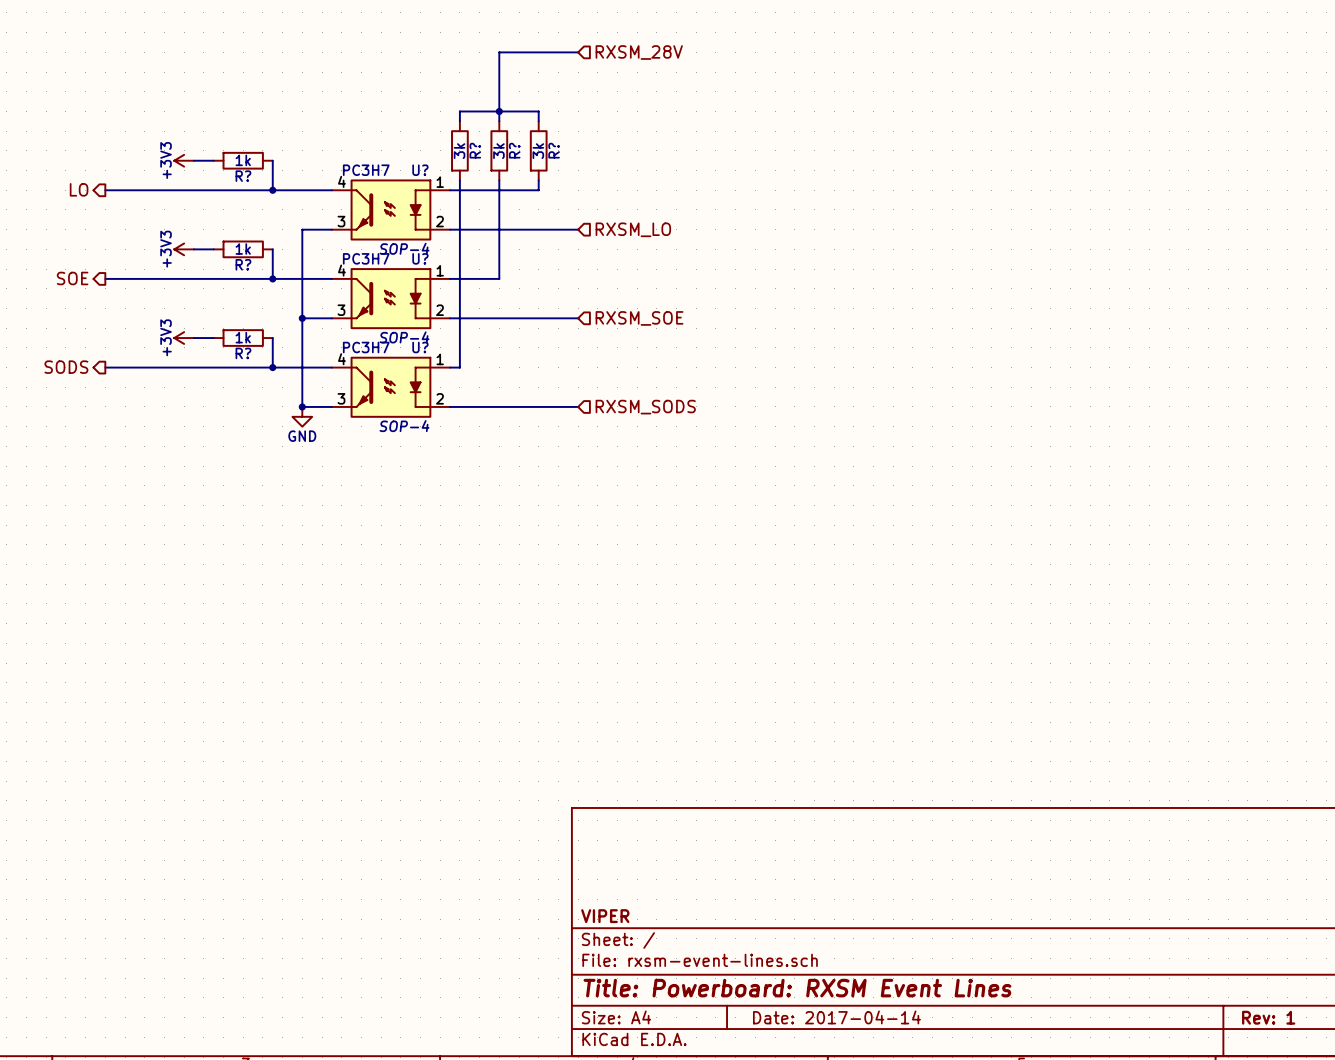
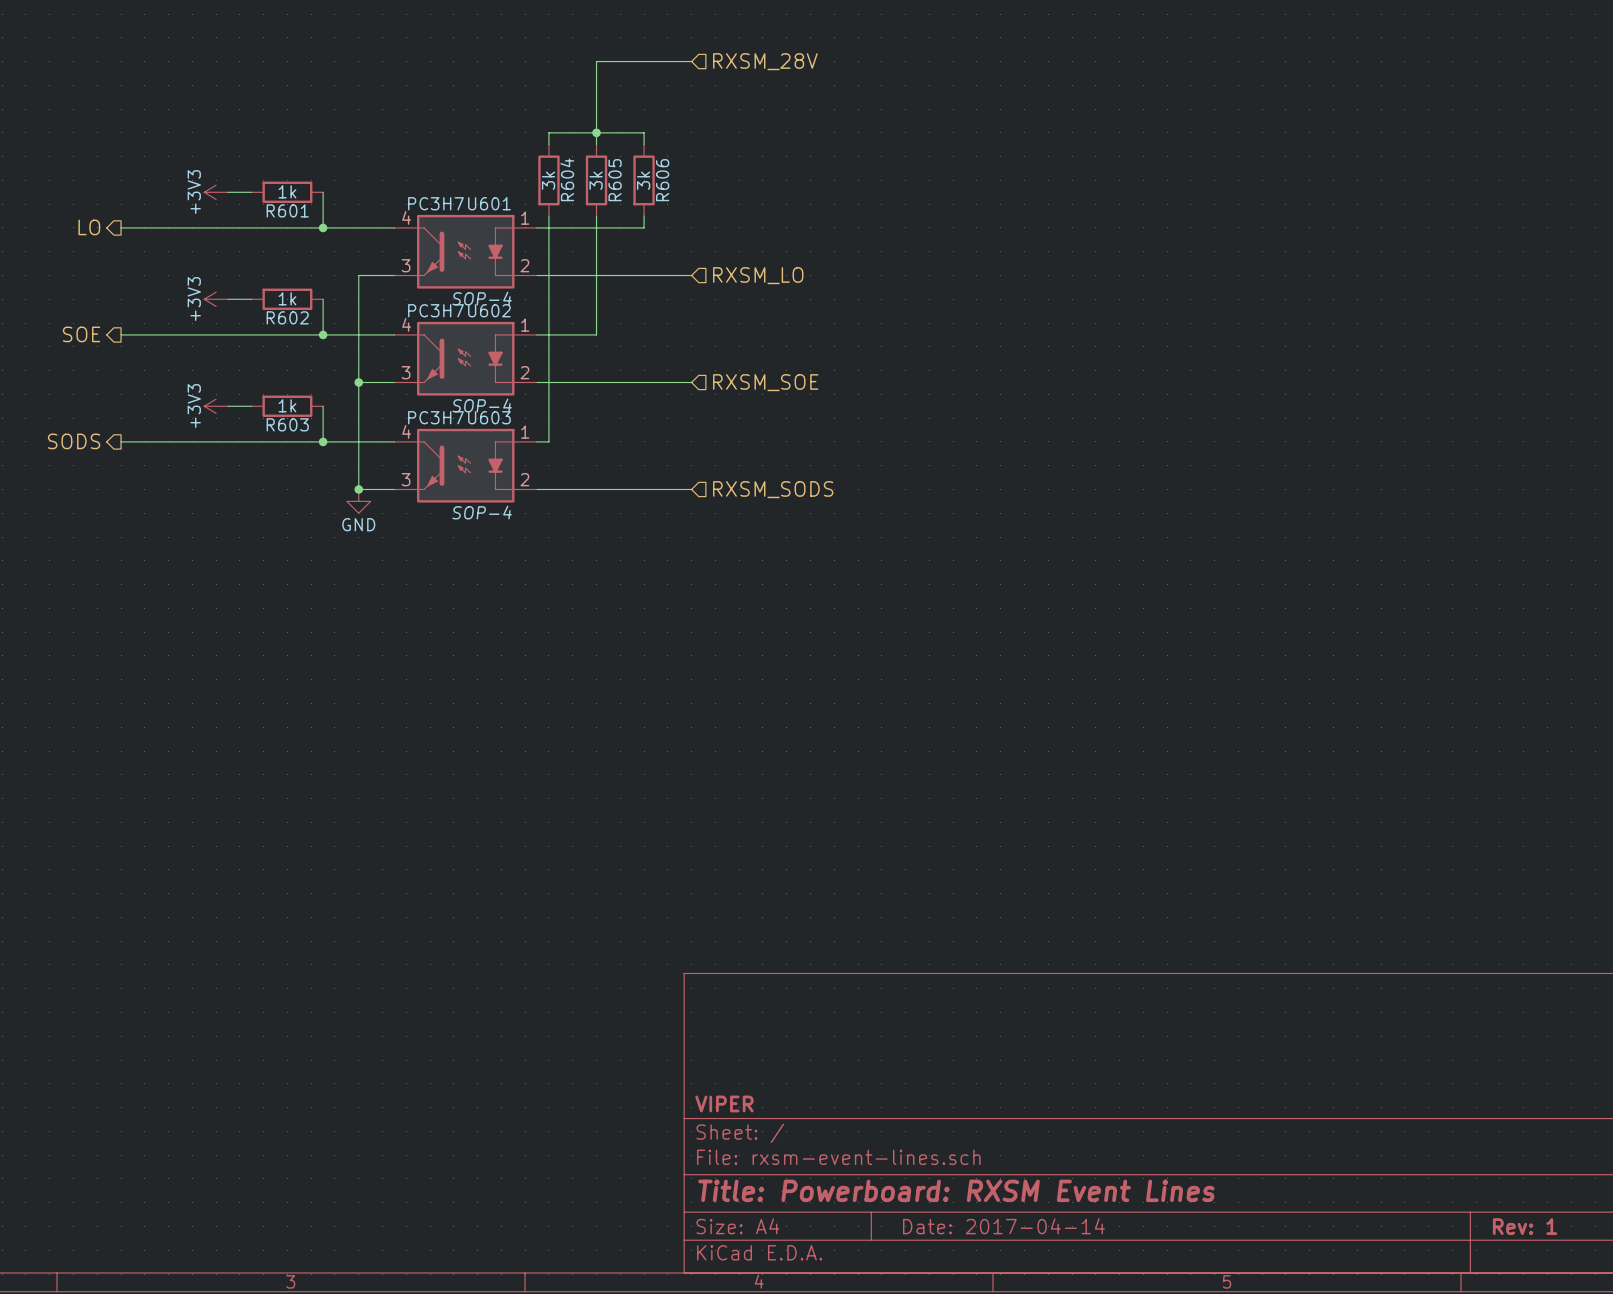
R? name: R? (475, 150) -> R604 (567, 179)
R? name: R? (514, 150) -> R605 (615, 180)
R? name: R? (554, 150) -> R606 (662, 180)
U? name: U? (420, 170) -> U601 (489, 203)
R? name: R? (243, 176) -> R601 (287, 210)
U? name: U? (420, 258) -> U602 (489, 310)
R? name: R? (243, 264) -> R602 (287, 317)
U? name: U? (420, 347) -> U603 (489, 417)
R? name: R? (243, 353) -> R603 (287, 424)

